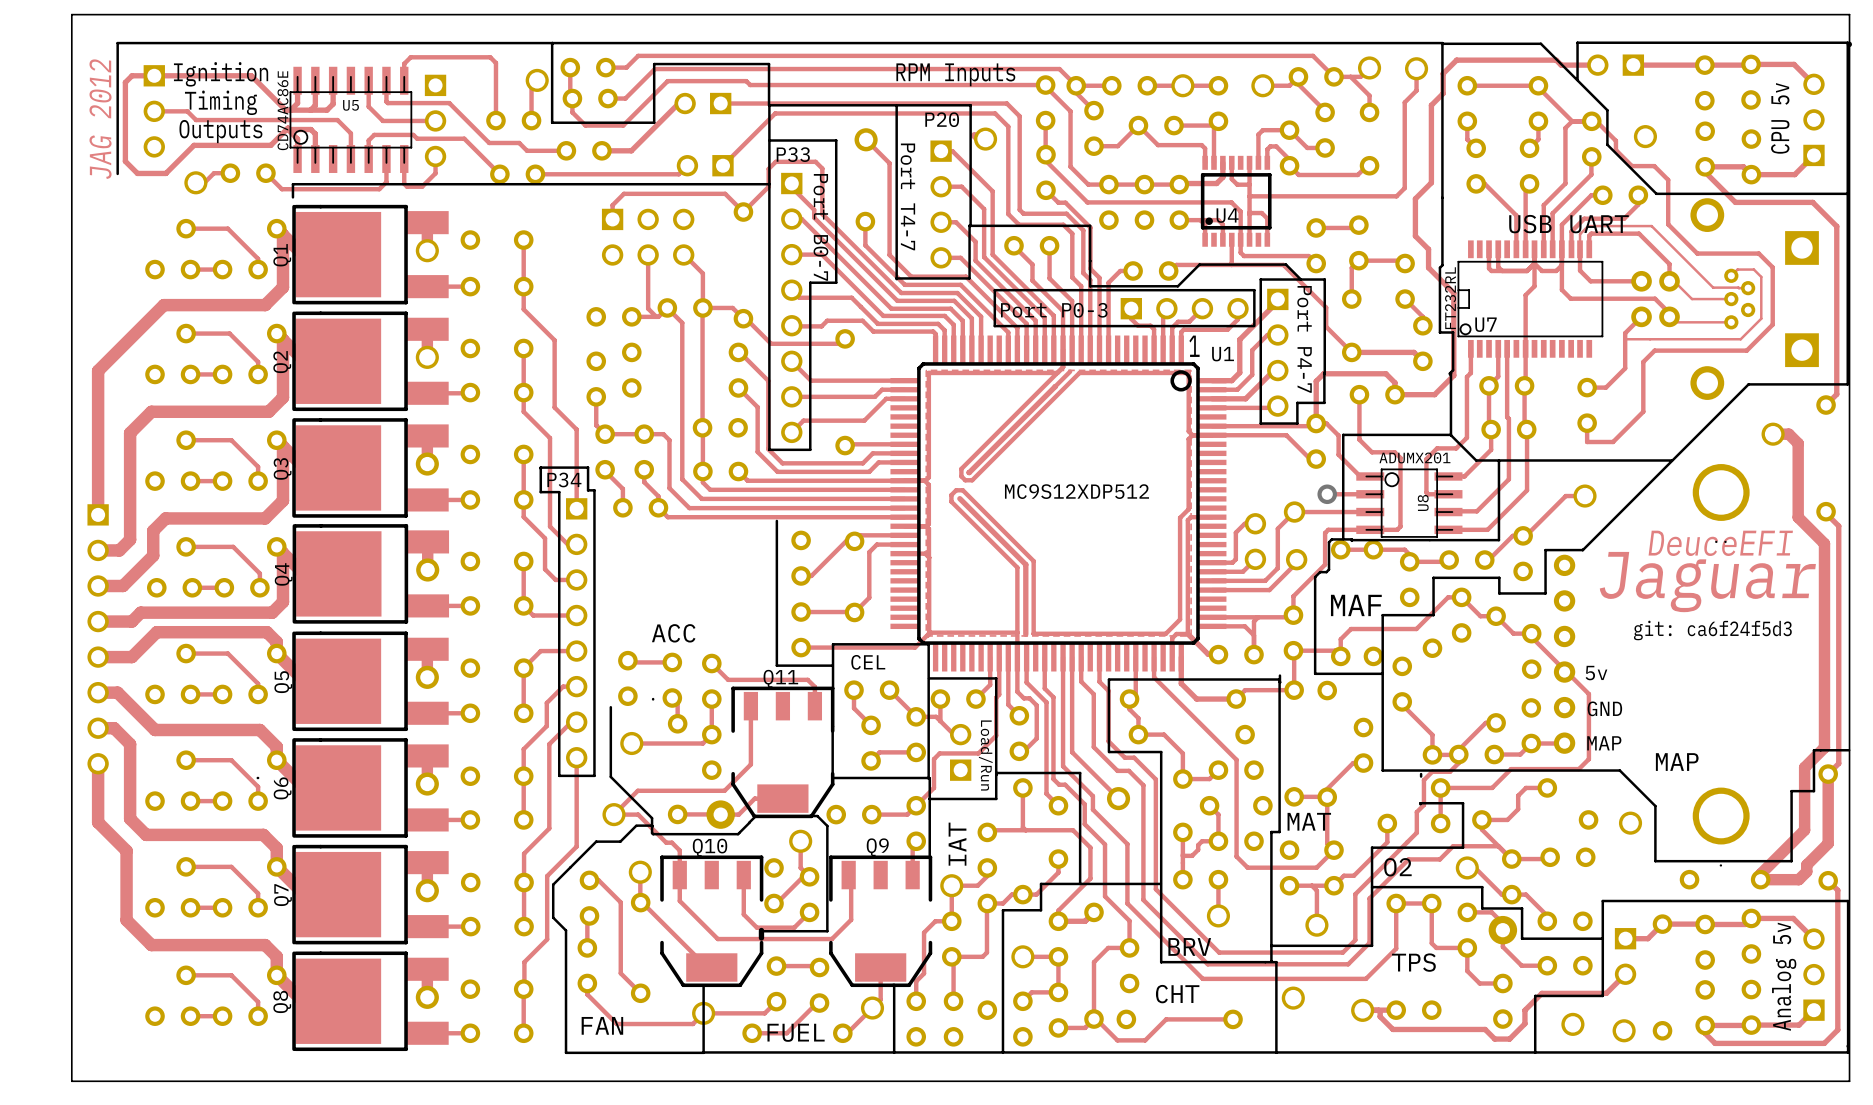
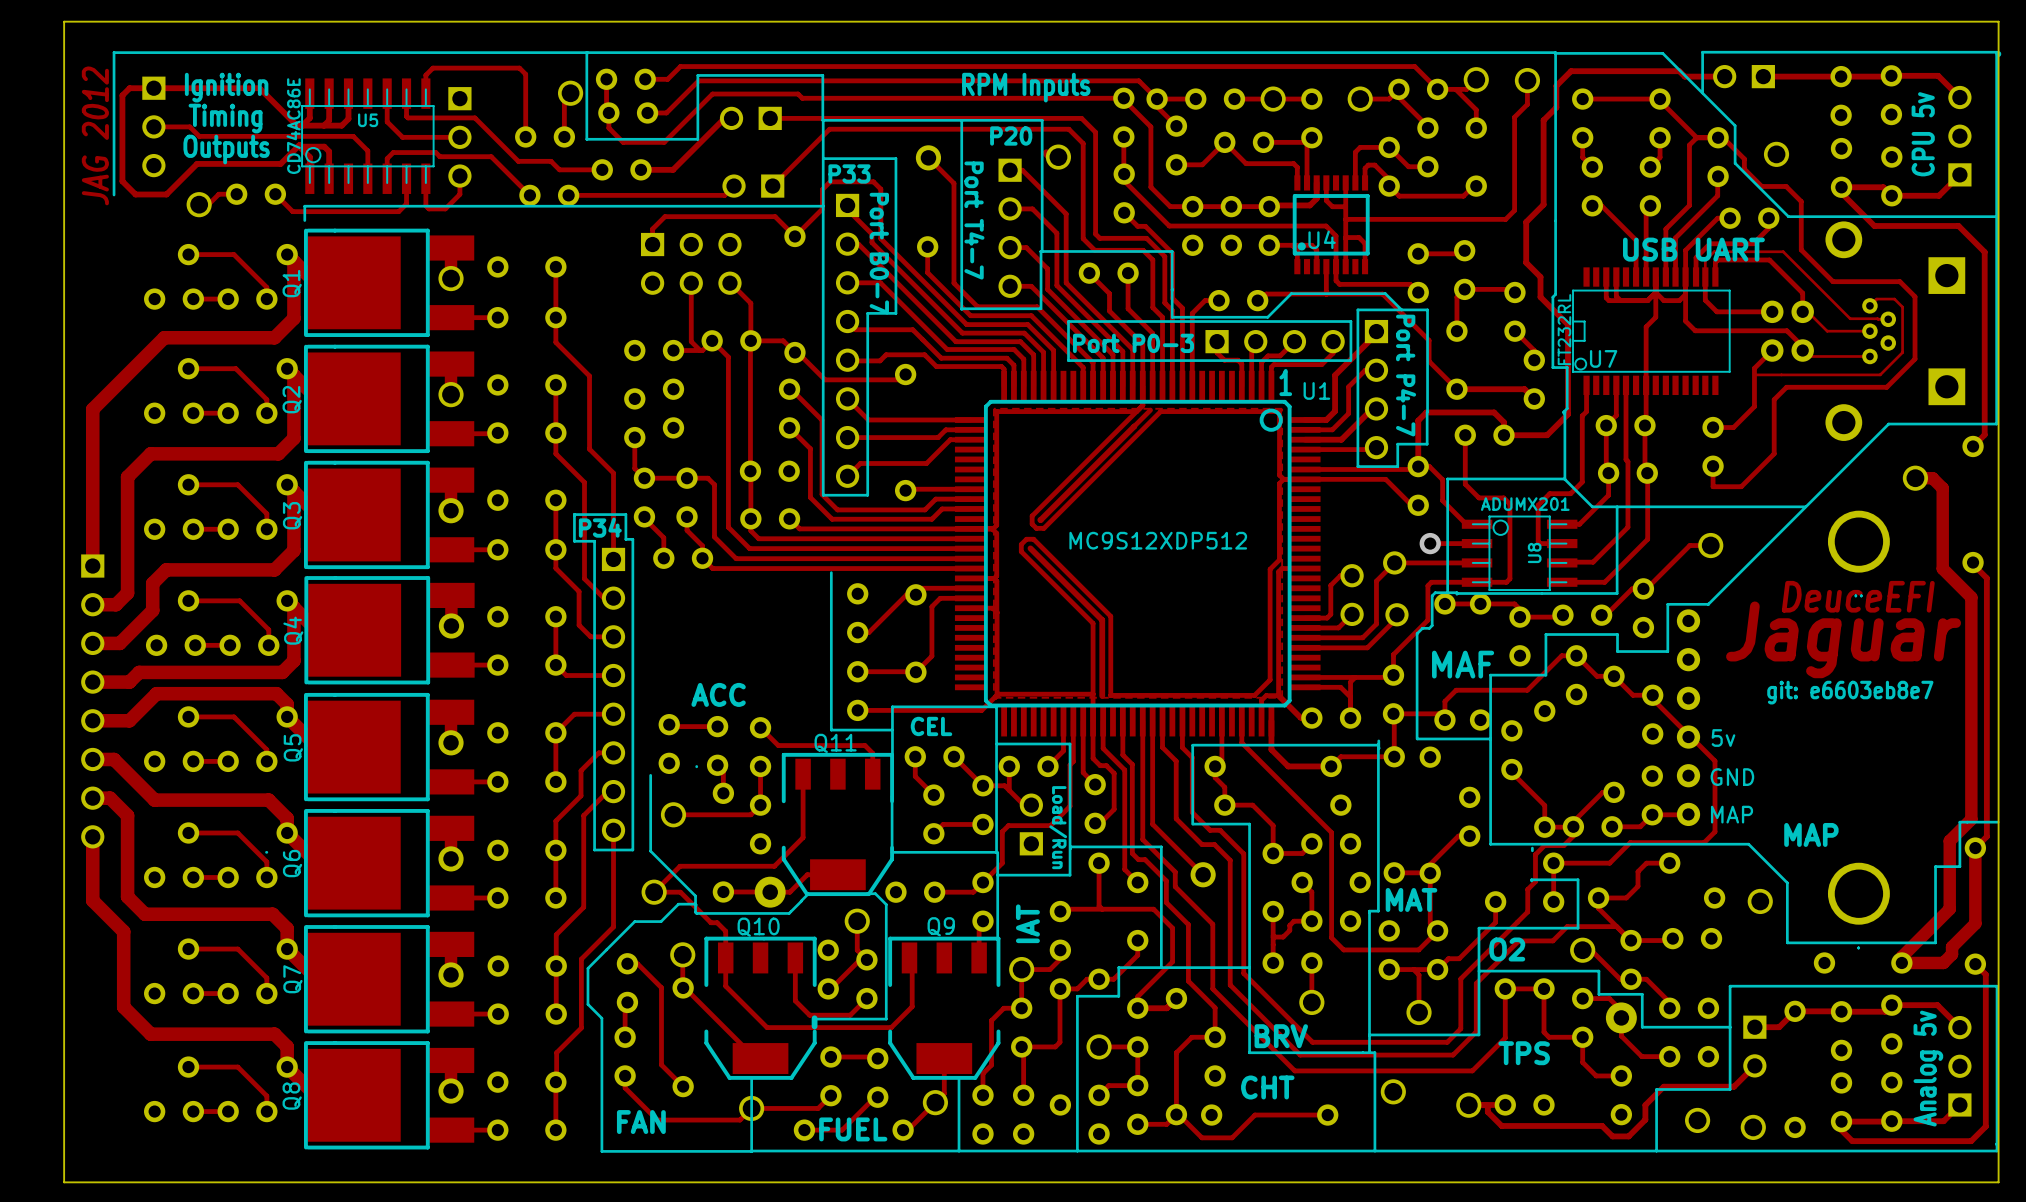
text: git: ca6f24f5d3 (1712, 630) -> git: e6603eb8e7 (1850, 692)

